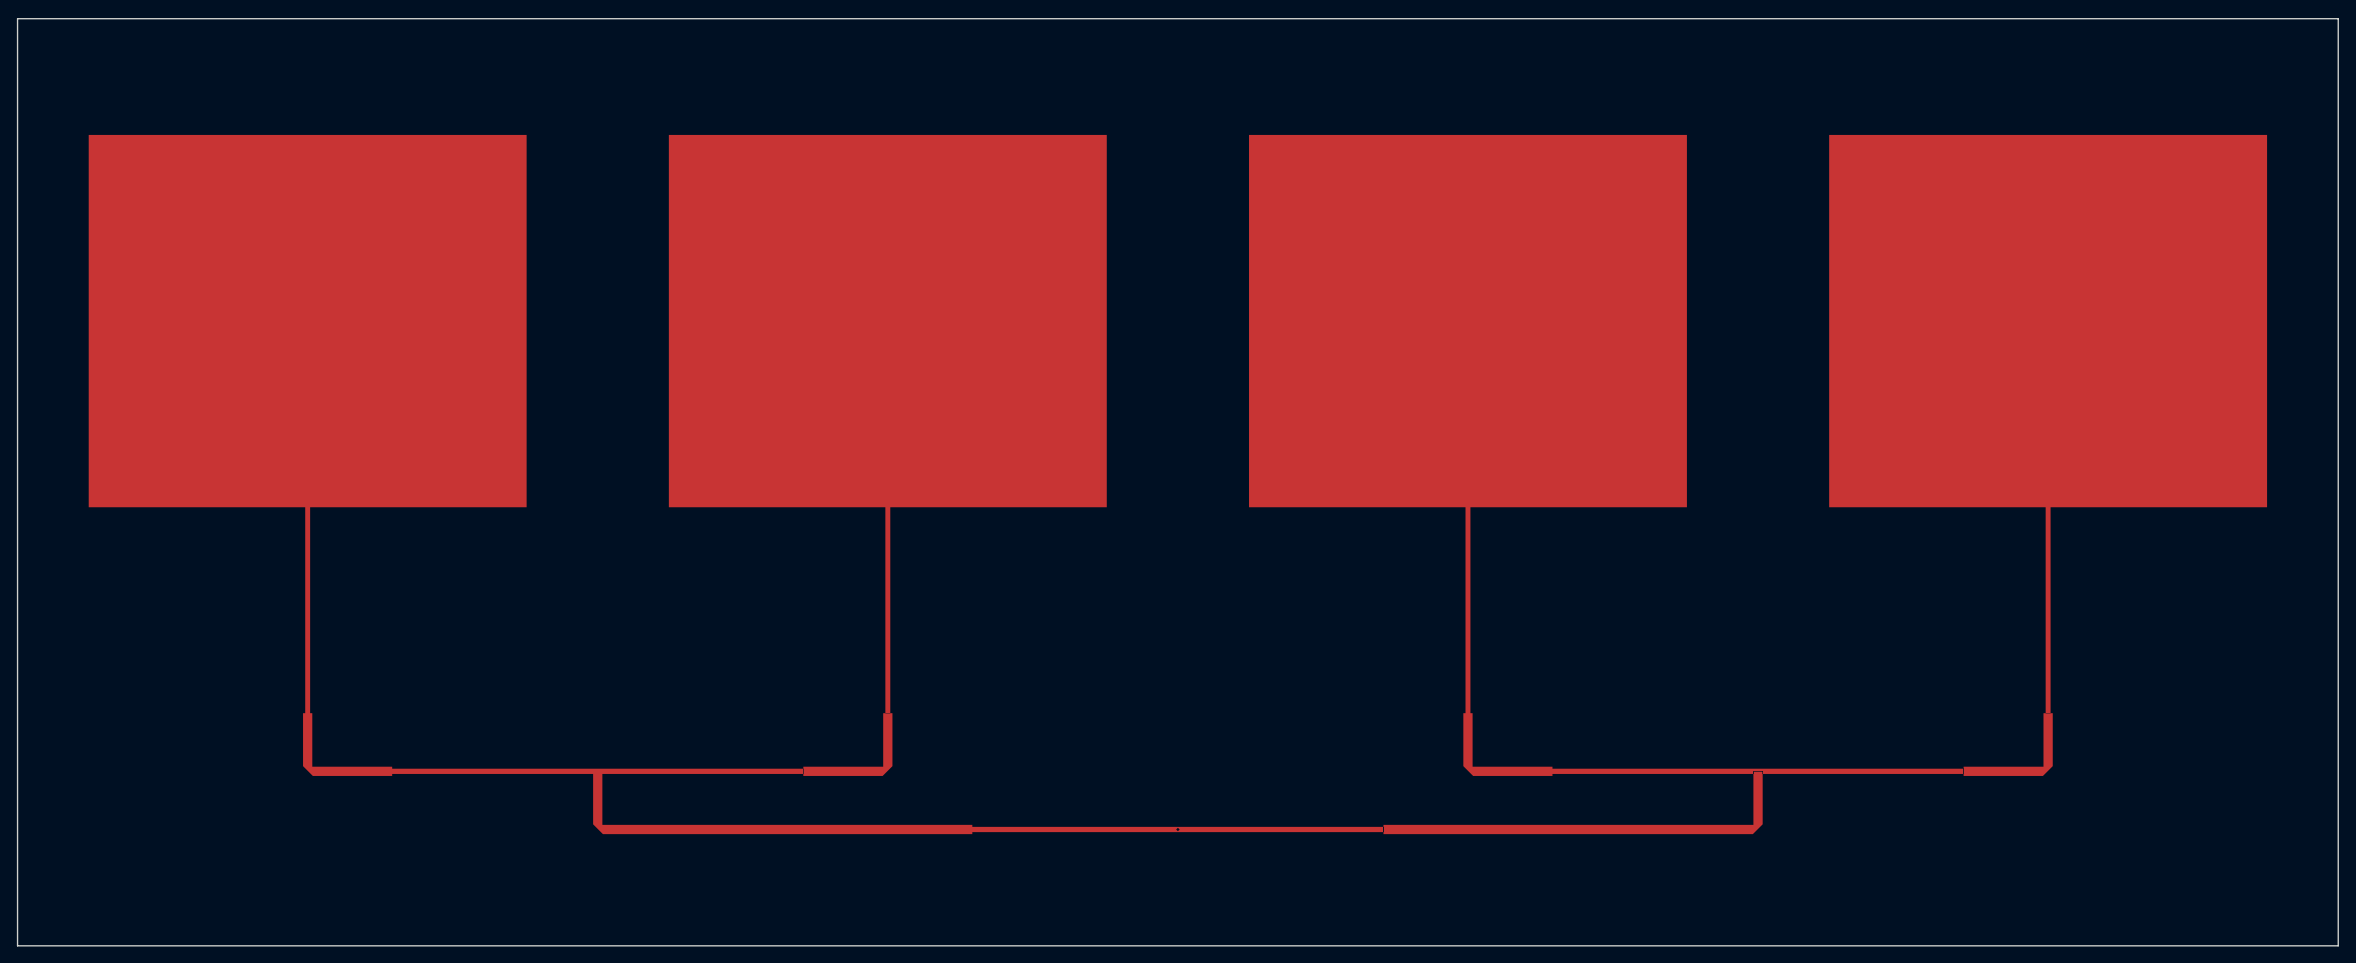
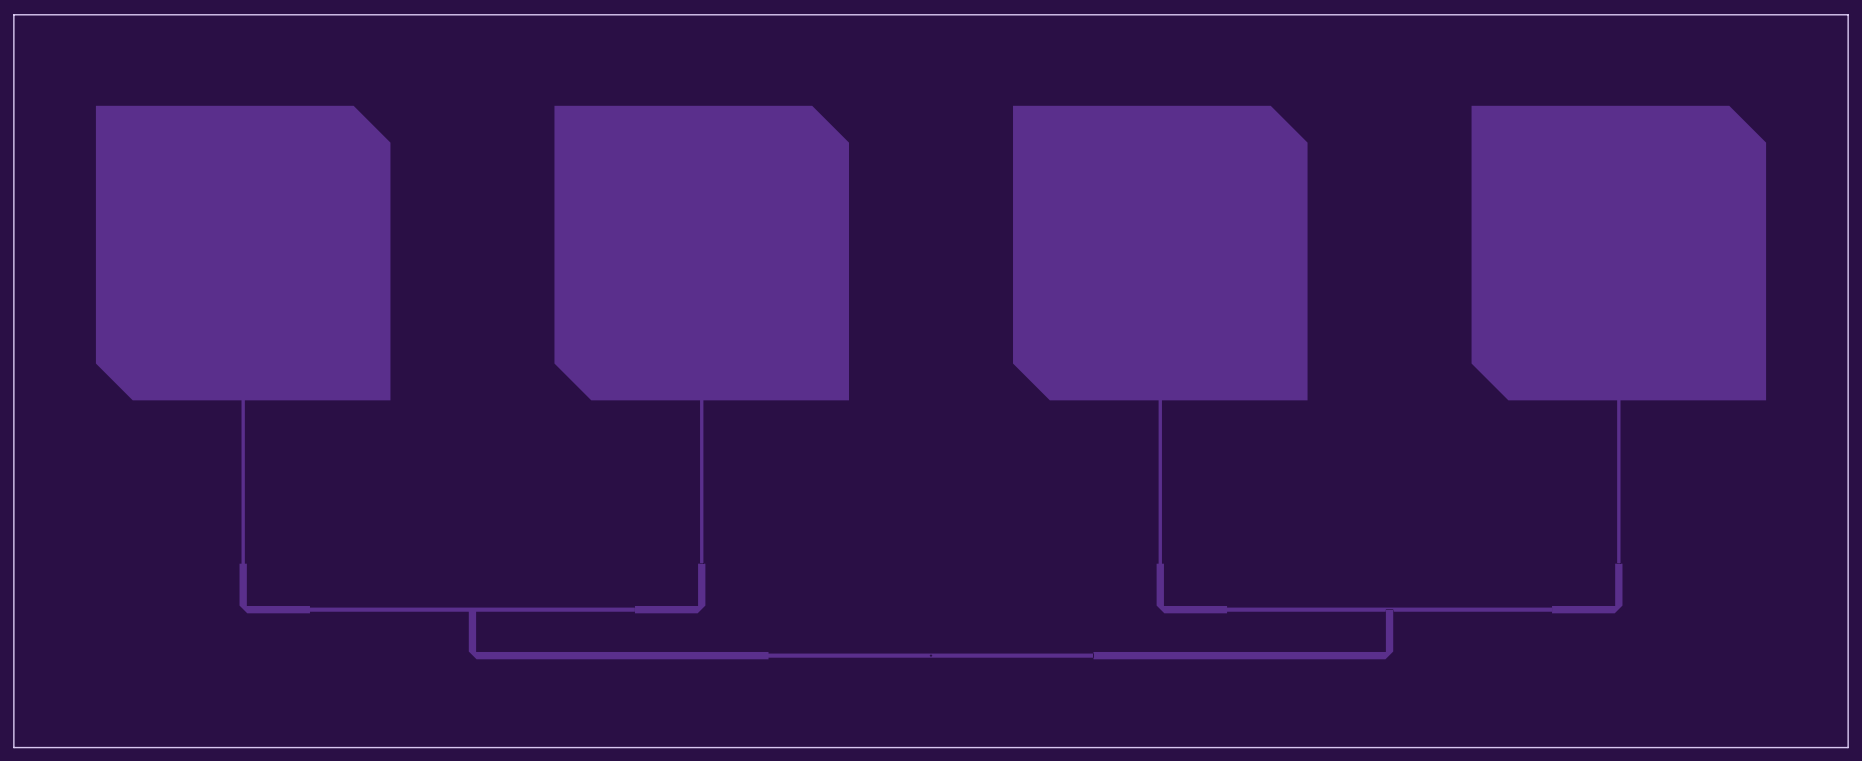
drawing shape: [88, 134, 2268, 835] -> [95, 105, 1767, 660]

